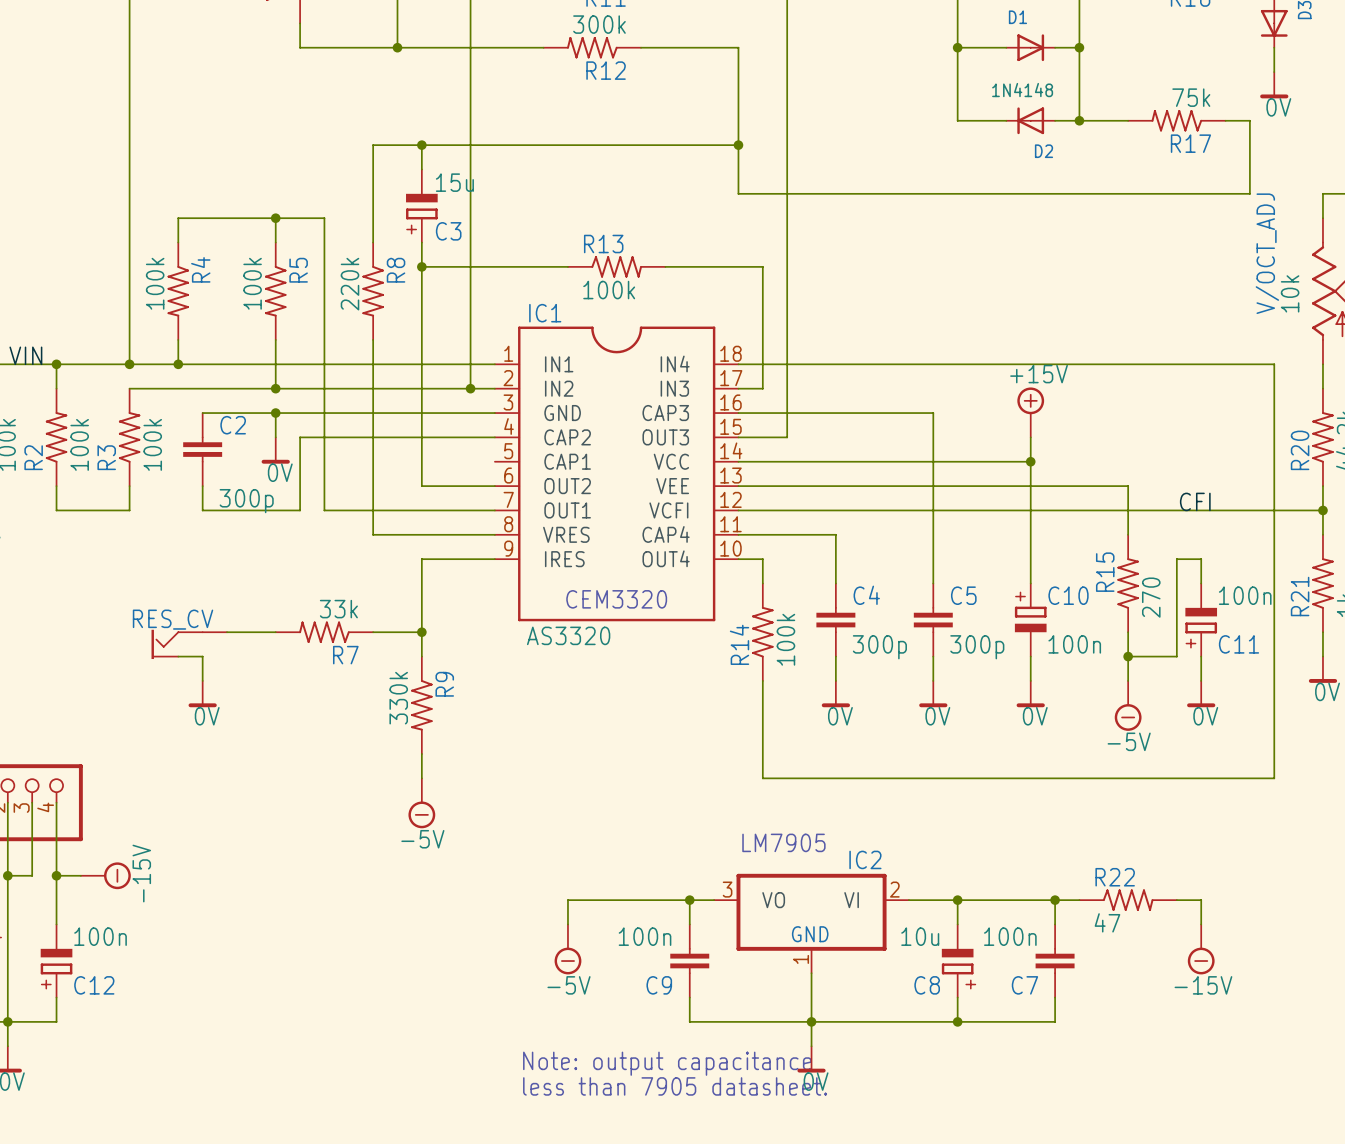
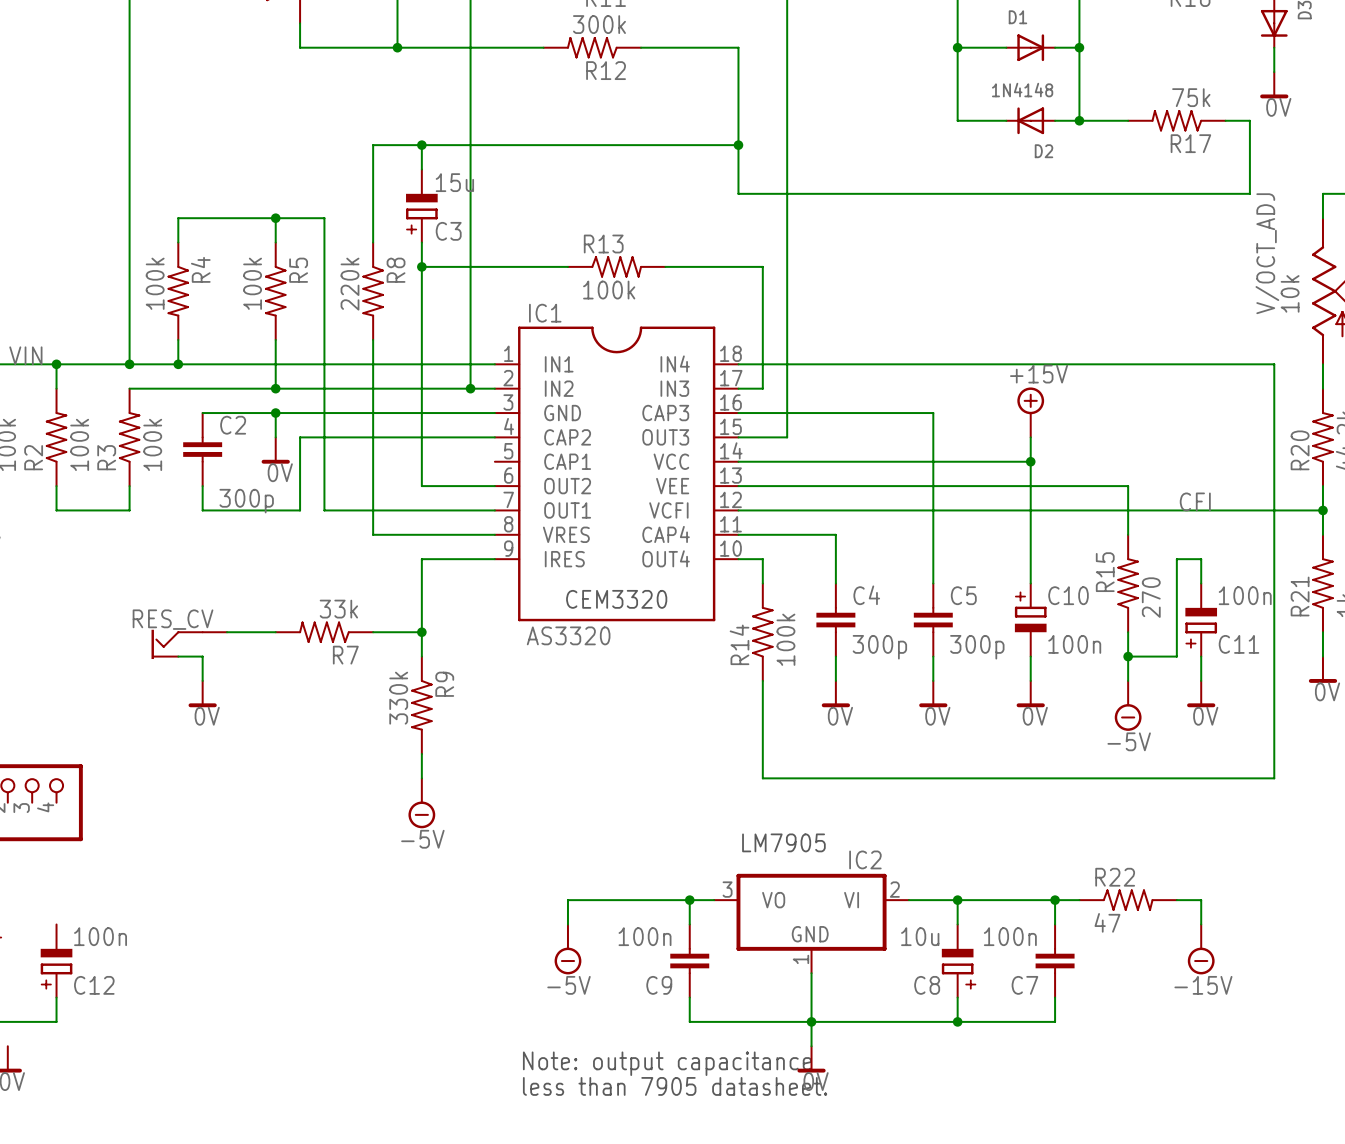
wire: (7, 802) (7, 1046) -> none
wire: (32, 802) (32, 875) (7, 875) -> none
wire: (56, 802) (56, 924) -> none
junction: (7, 875) -> none
wire: (56, 875) (80, 875) -> none
junction: (56, 875) -> none
power symbol: -15V (105, 875) -> none
junction: (7, 1021) -> none

